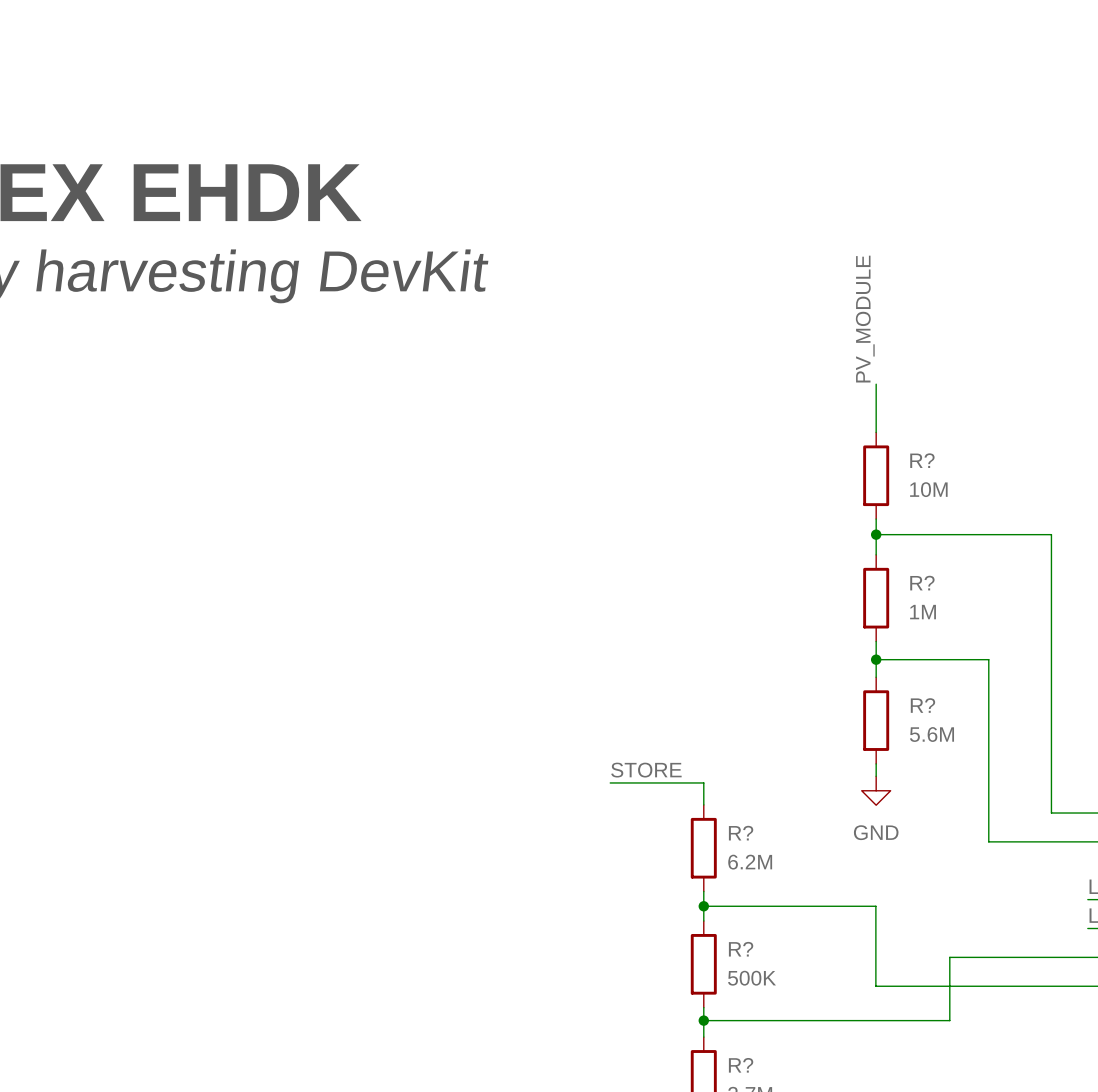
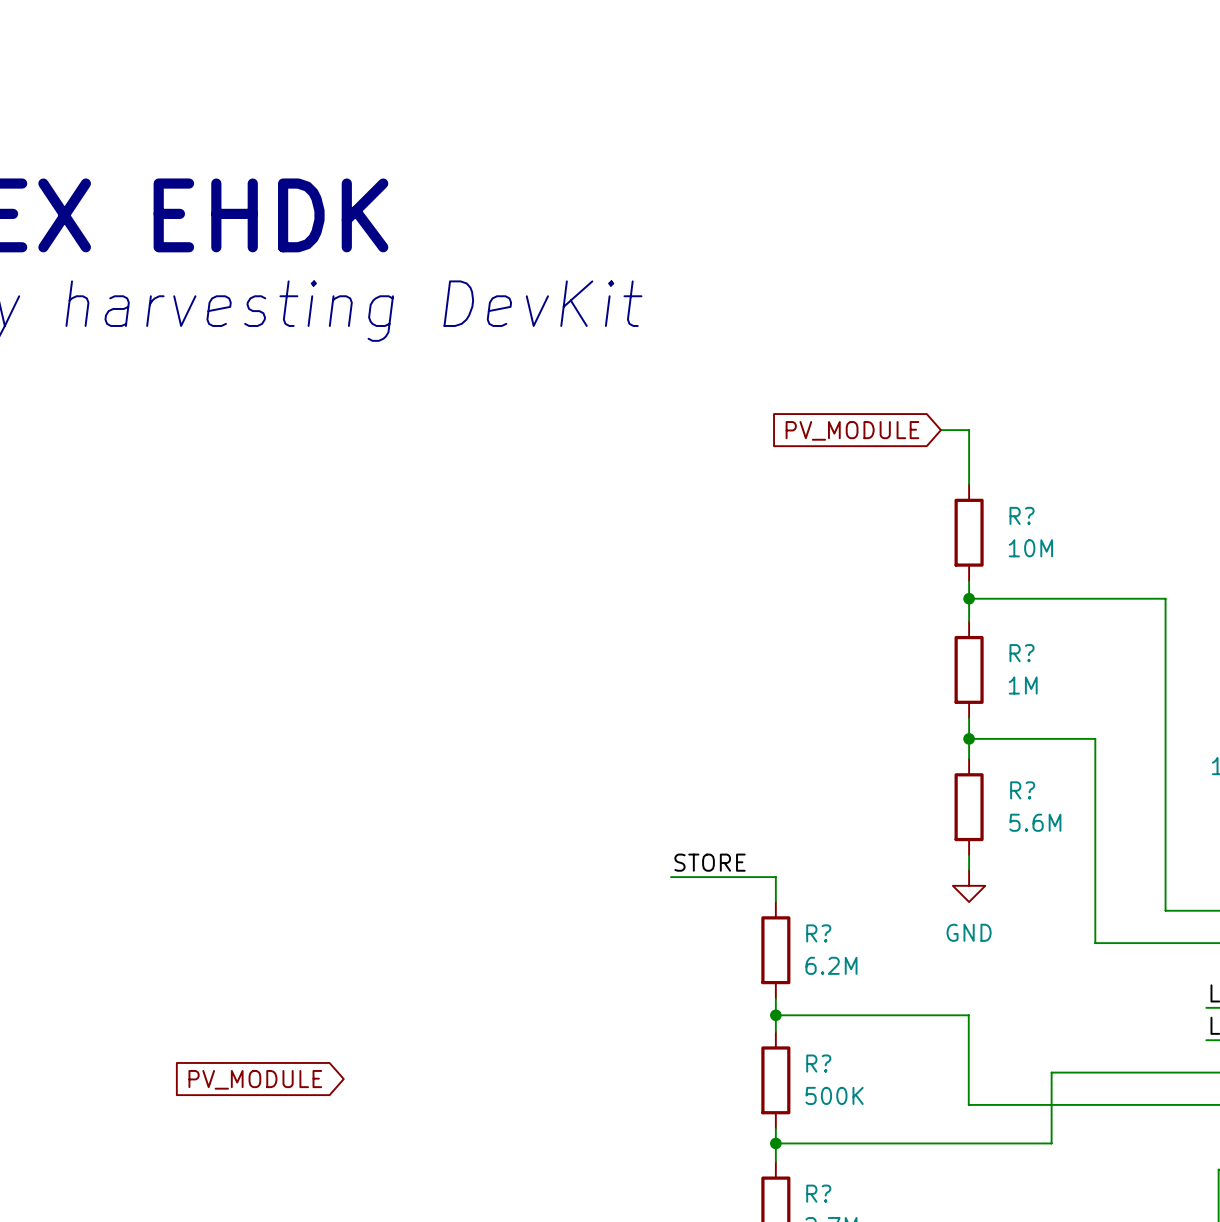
label: PV_MODULE (865, 319) -> none
wire: none -> (940, 430) (969, 430)
global label: none -> PV_MODULE (852, 430)
global label: none -> PV_MODULE (255, 1079)

